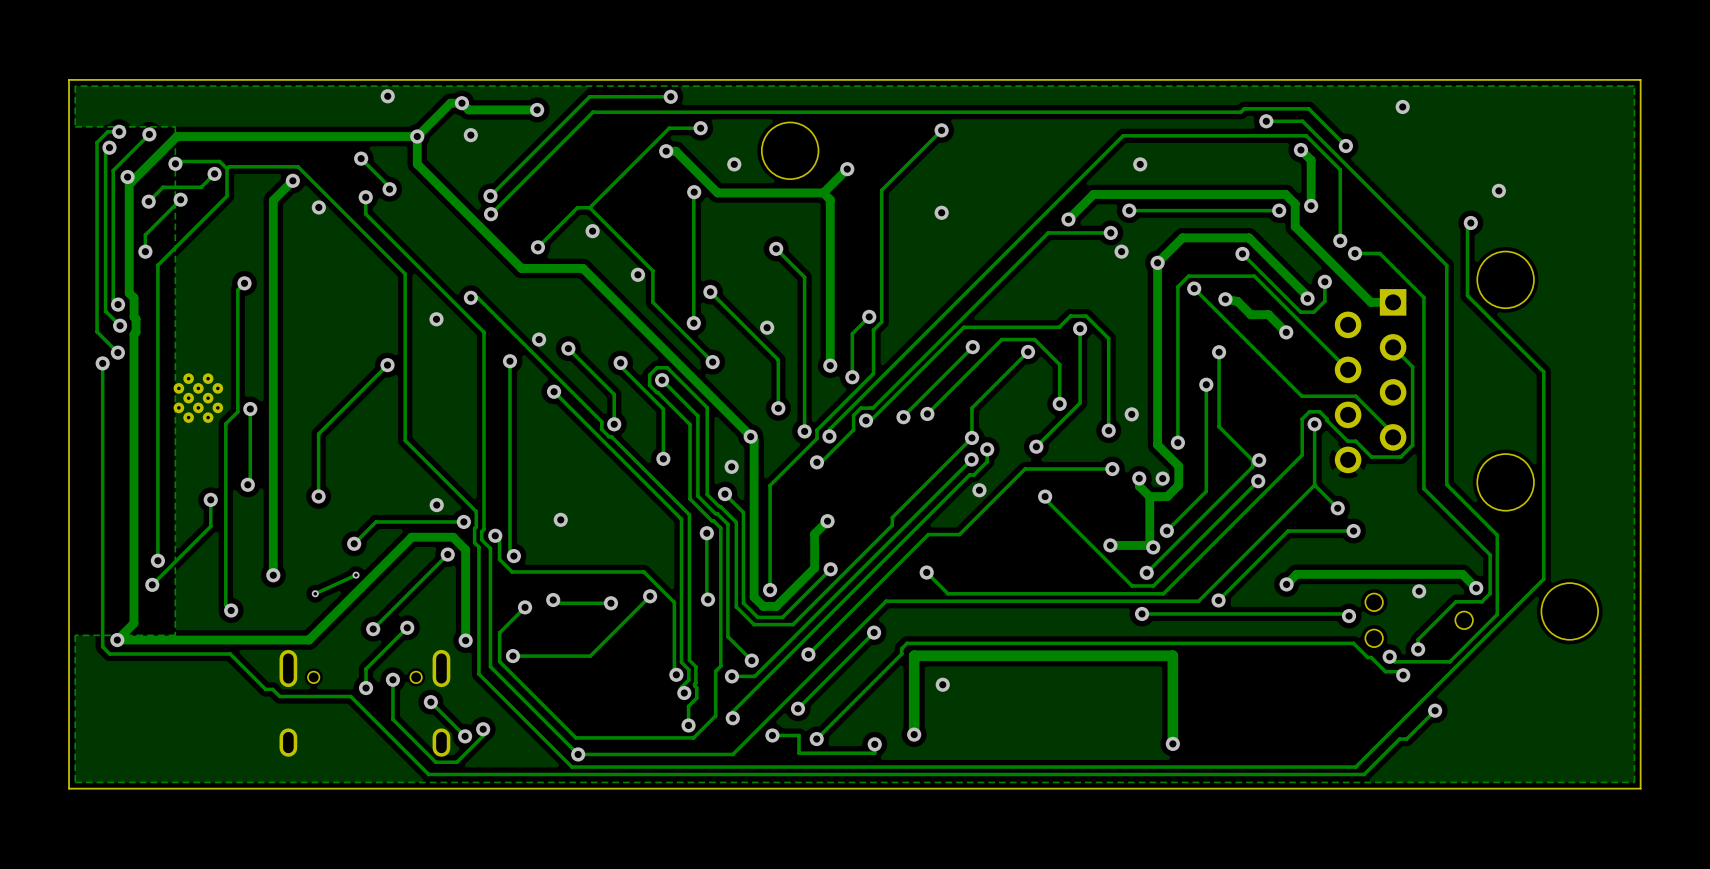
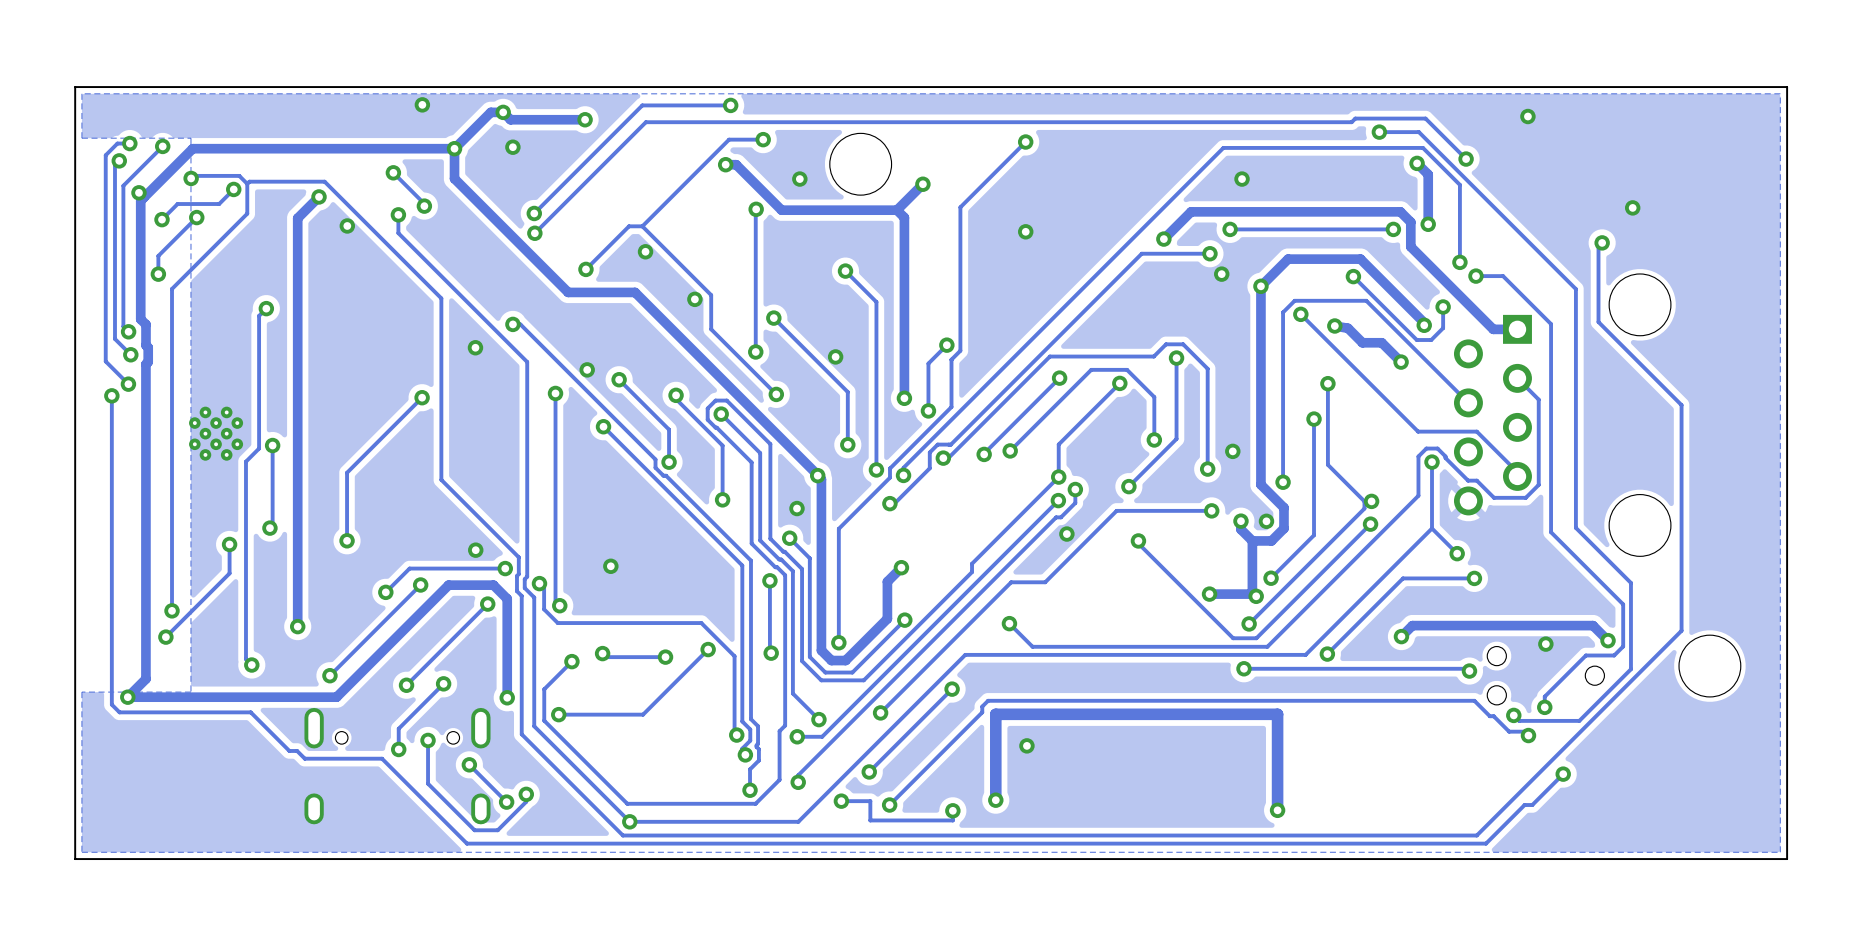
track: none -> (420, 584) (329, 675)
via: none -> (420, 584)
track: (356, 575) (315, 593) -> none
via: (356, 575) -> none
via: (315, 593) -> none
via: none -> (329, 675)

